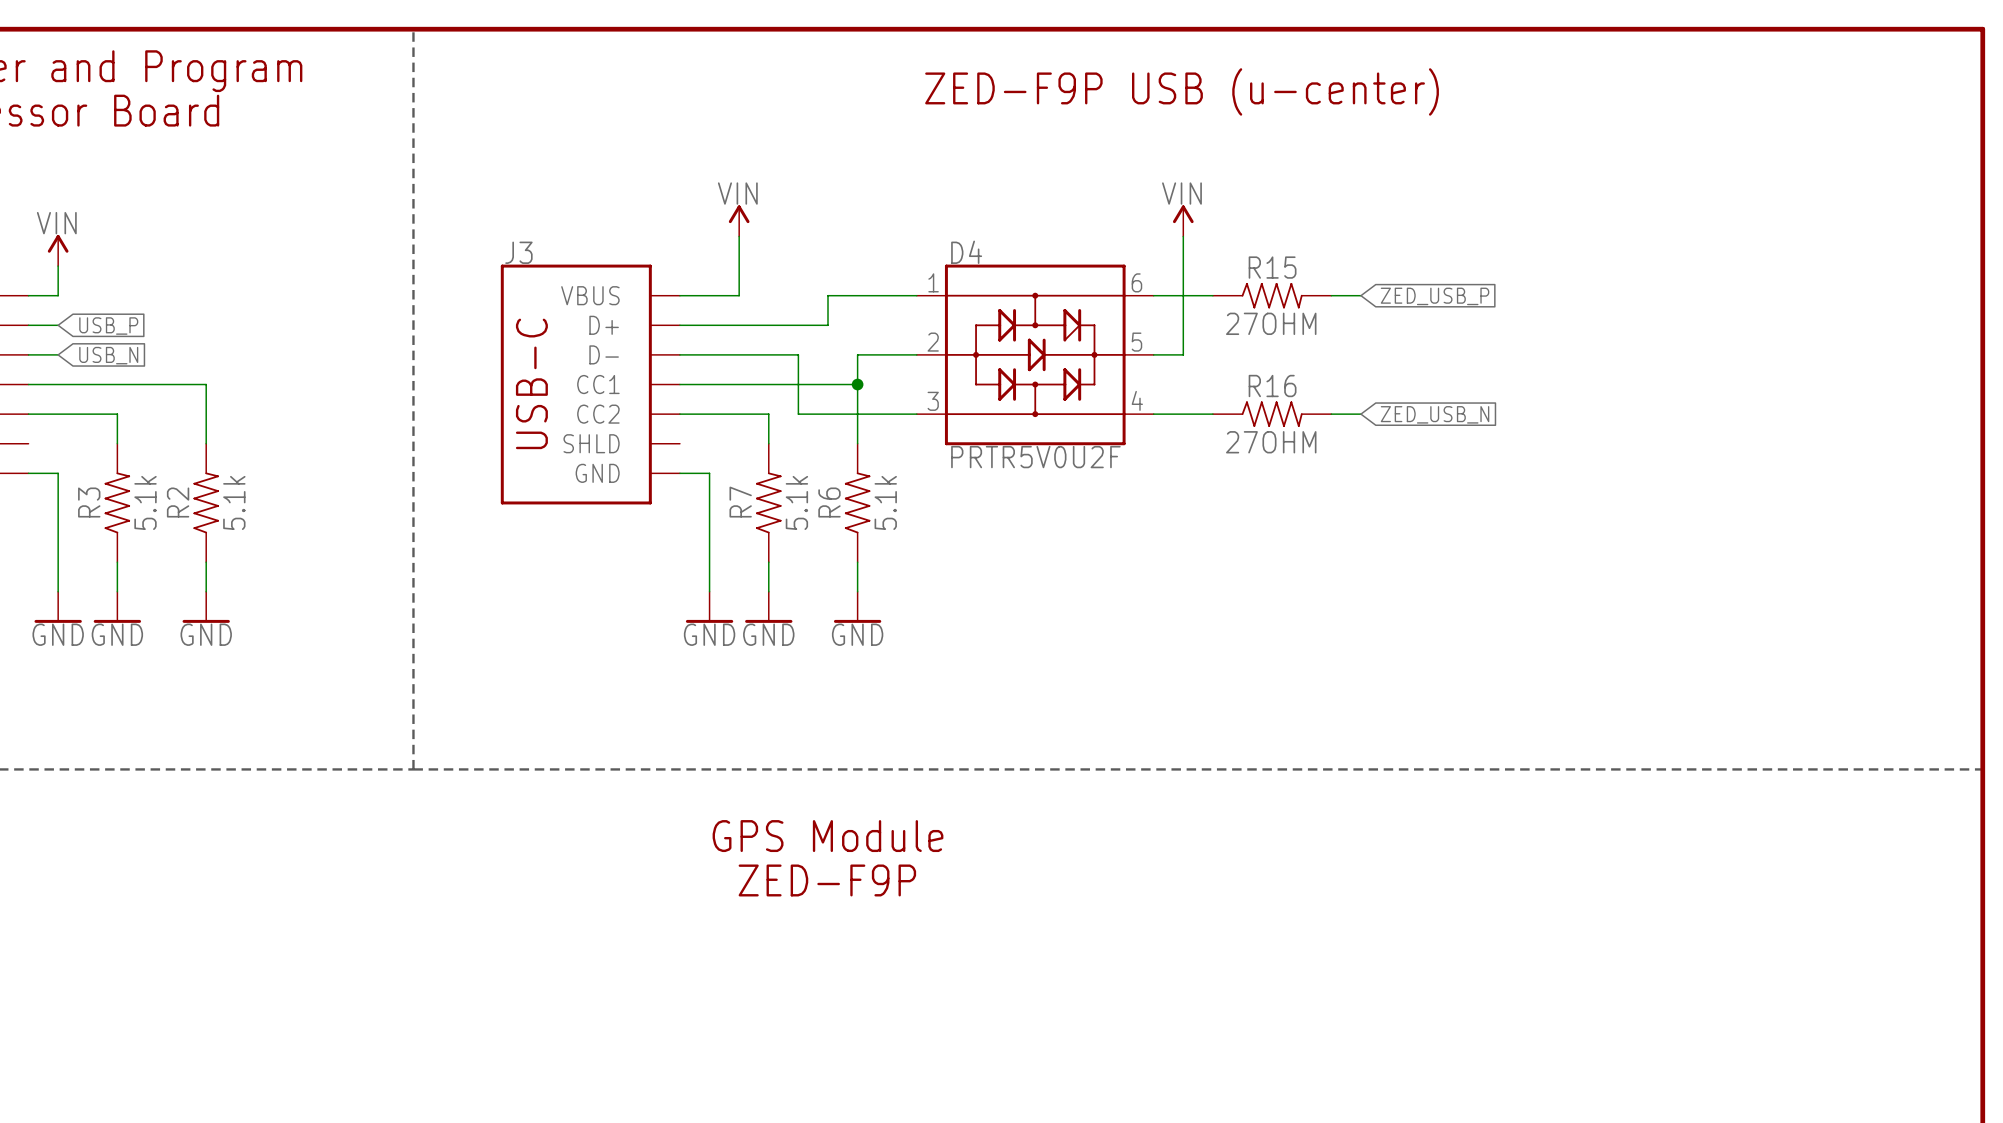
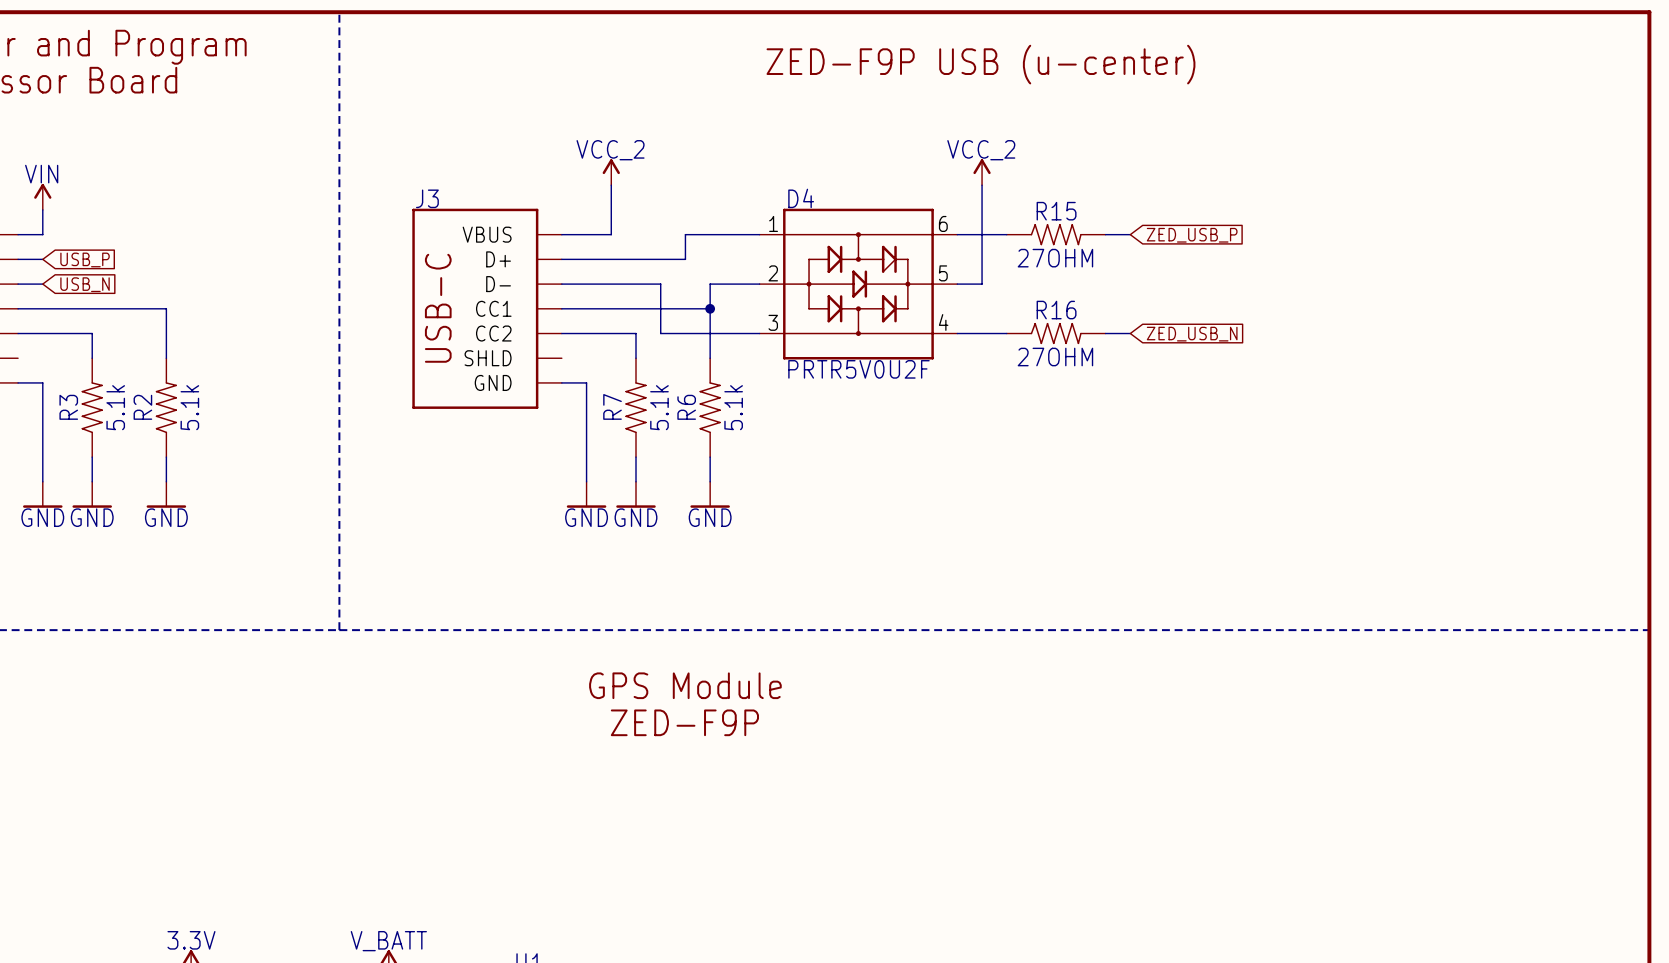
power symbol: VIN (739, 220) -> VCC_2 (611, 172)
power symbol: VIN (1183, 220) -> VCC_2 (982, 172)

